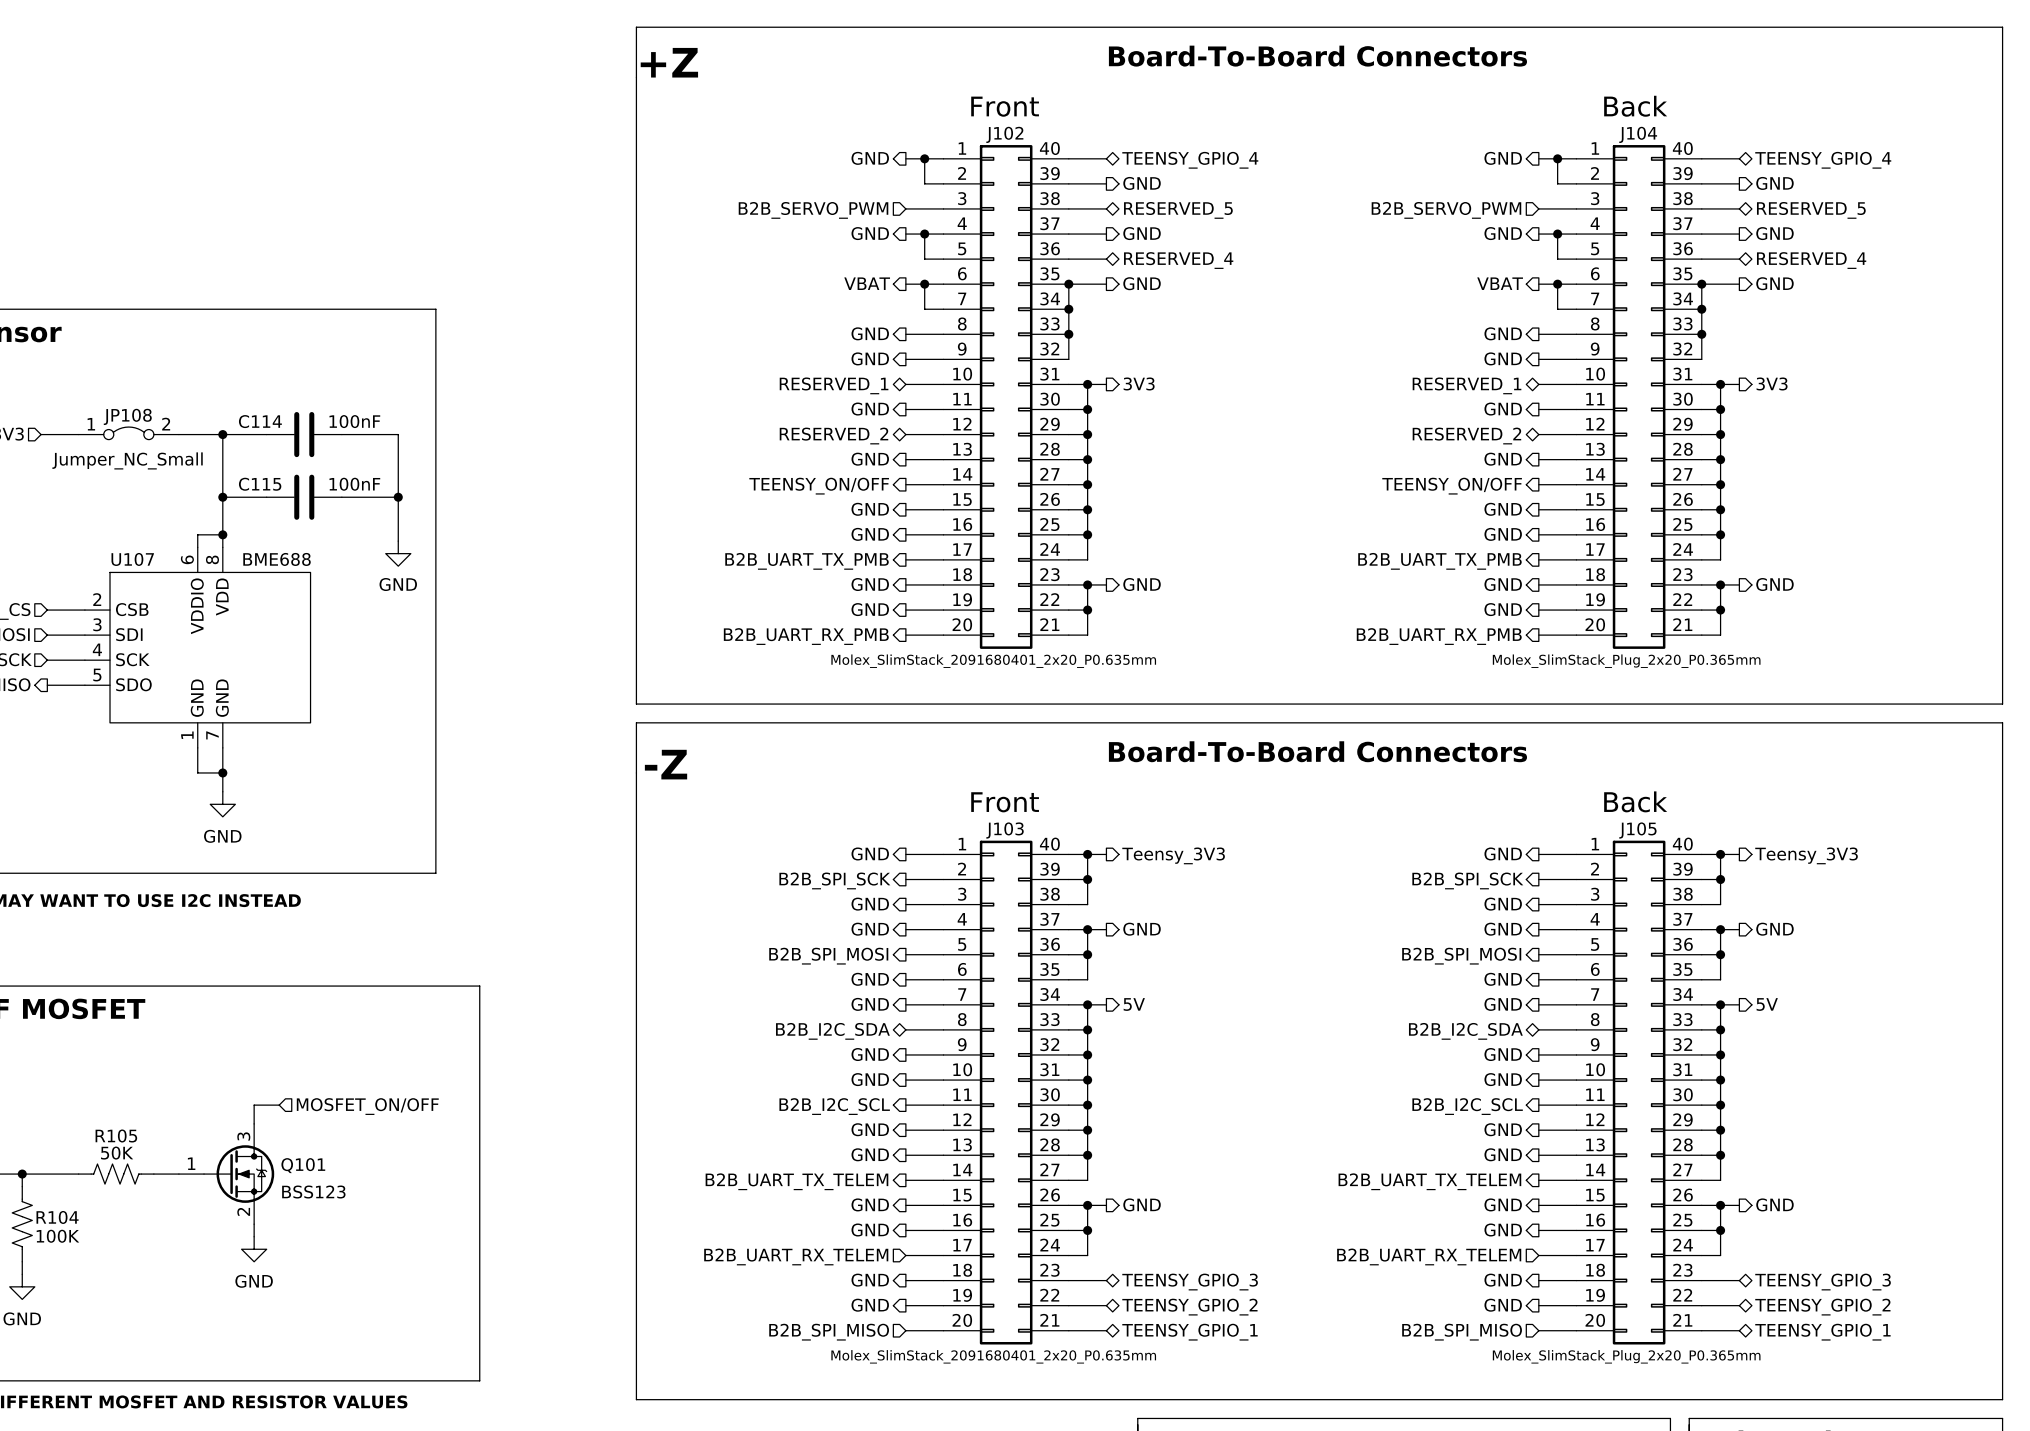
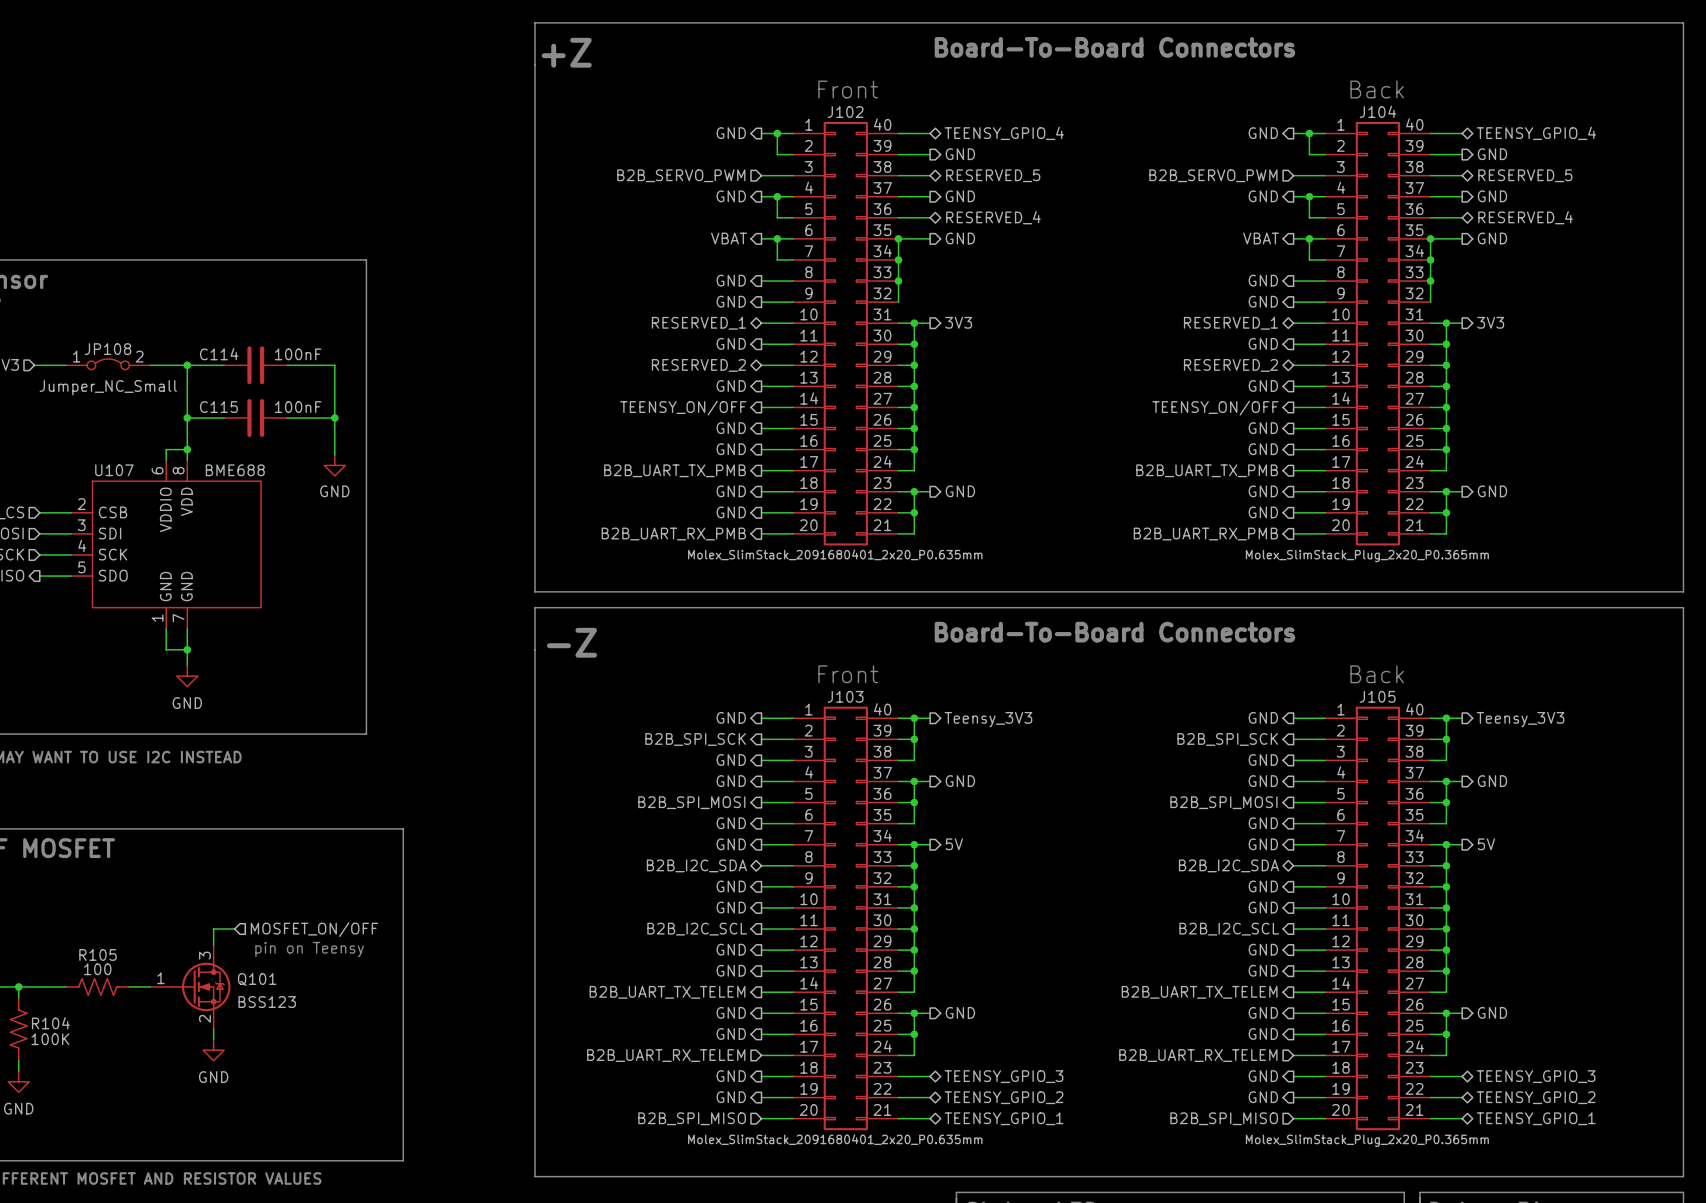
text: none -> pin on Teensy (309, 949)
R105 value: 50K (117, 1153) -> 100 (97, 969)

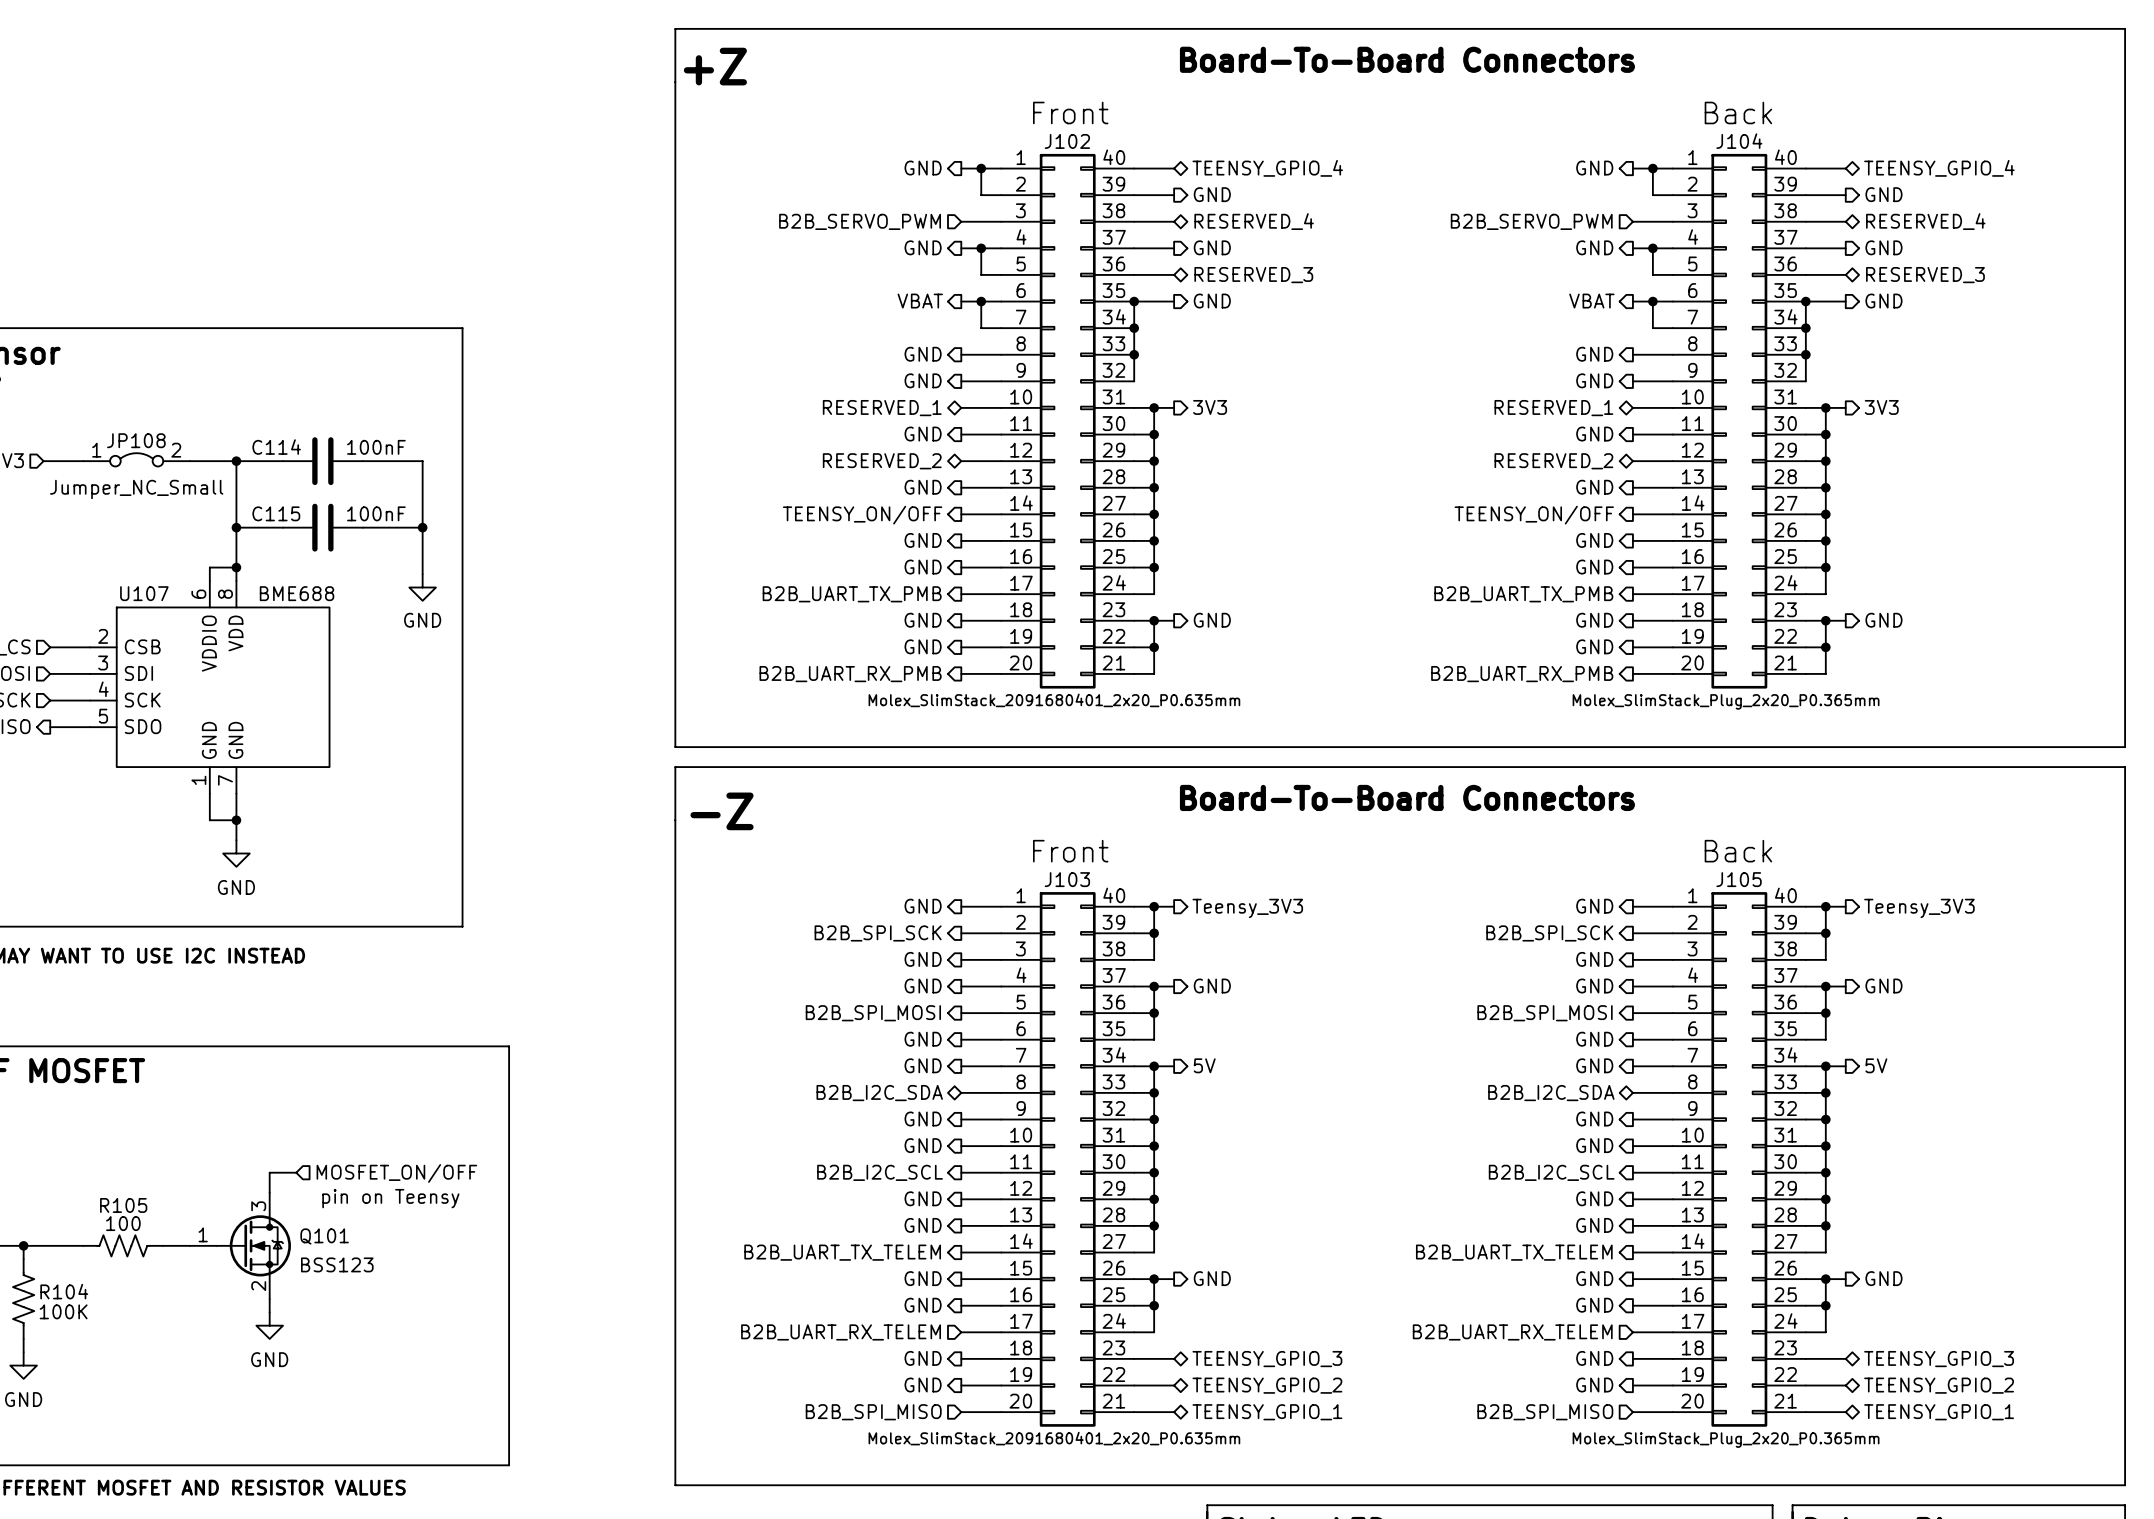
hierarchical label: RESERVED_5 (993, 175) -> RESERVED_4 (1254, 221)
hierarchical label: RESERVED_5 (1525, 175) -> RESERVED_4 (1925, 221)
hierarchical label: RESERVED_4 (993, 217) -> RESERVED_3 (1253, 275)
hierarchical label: RESERVED_4 (1525, 217) -> RESERVED_3 (1925, 275)

